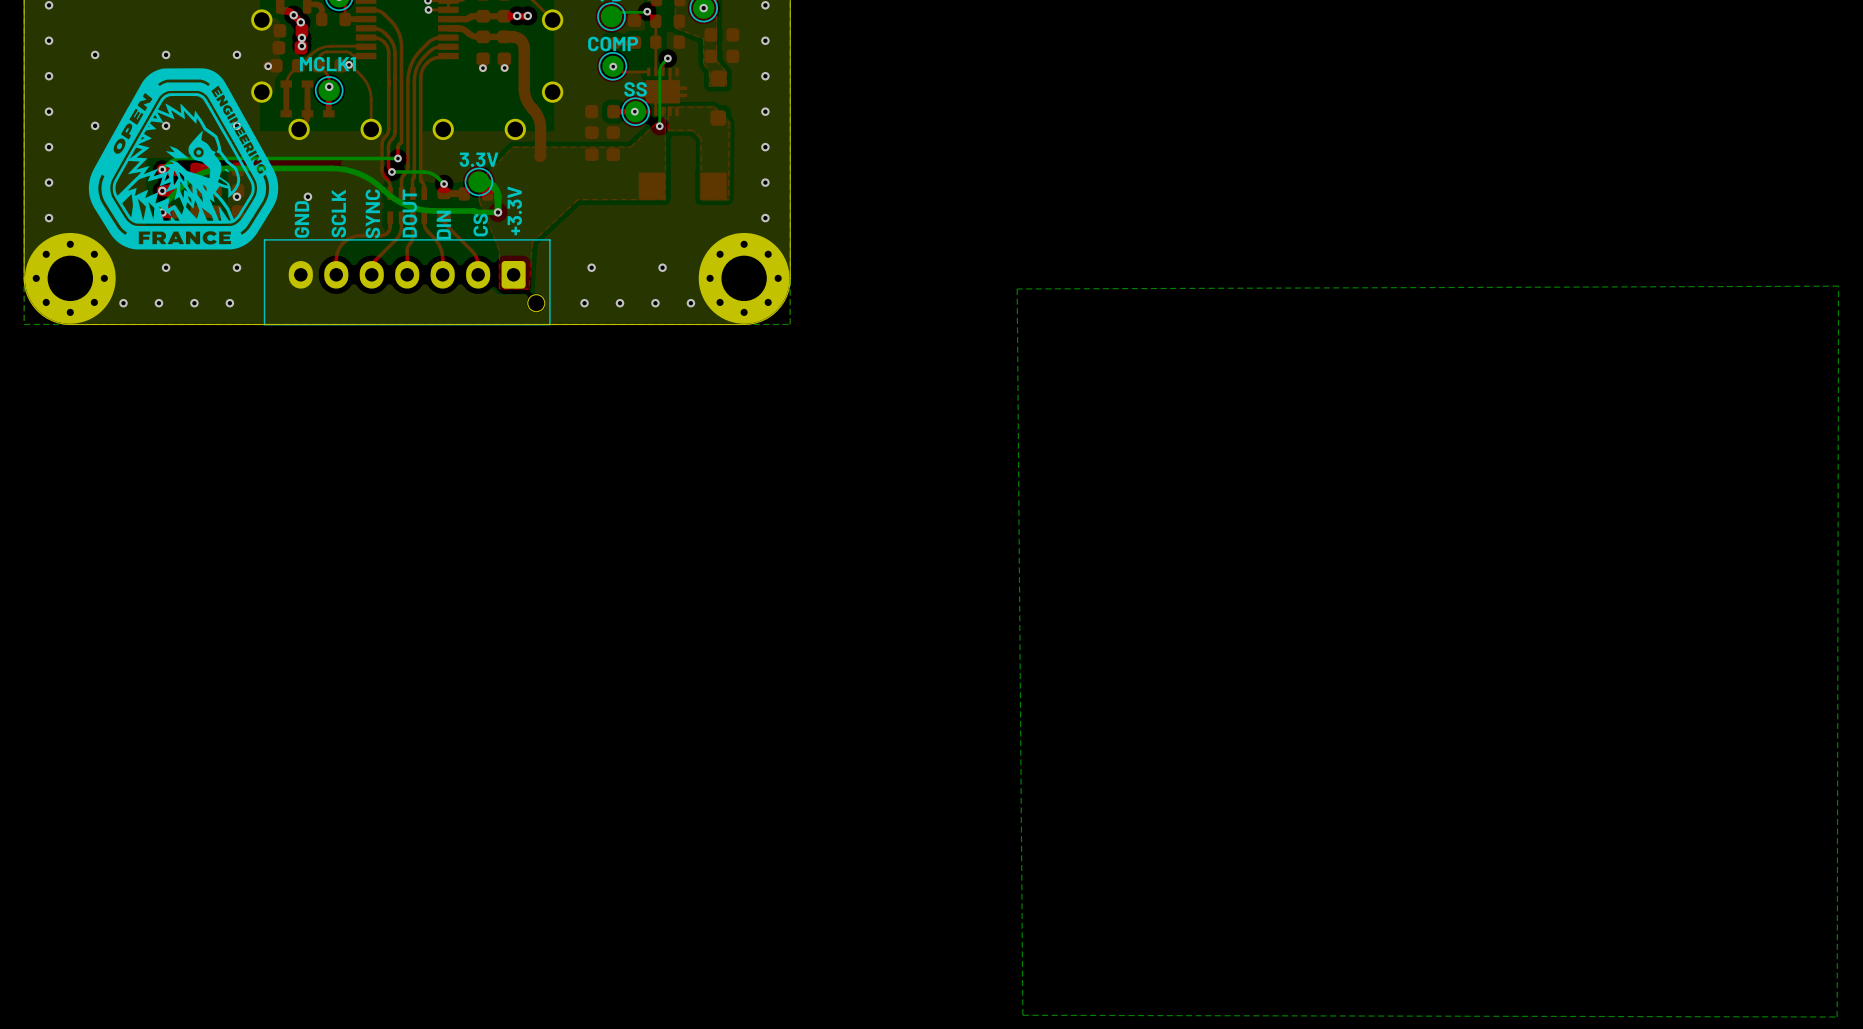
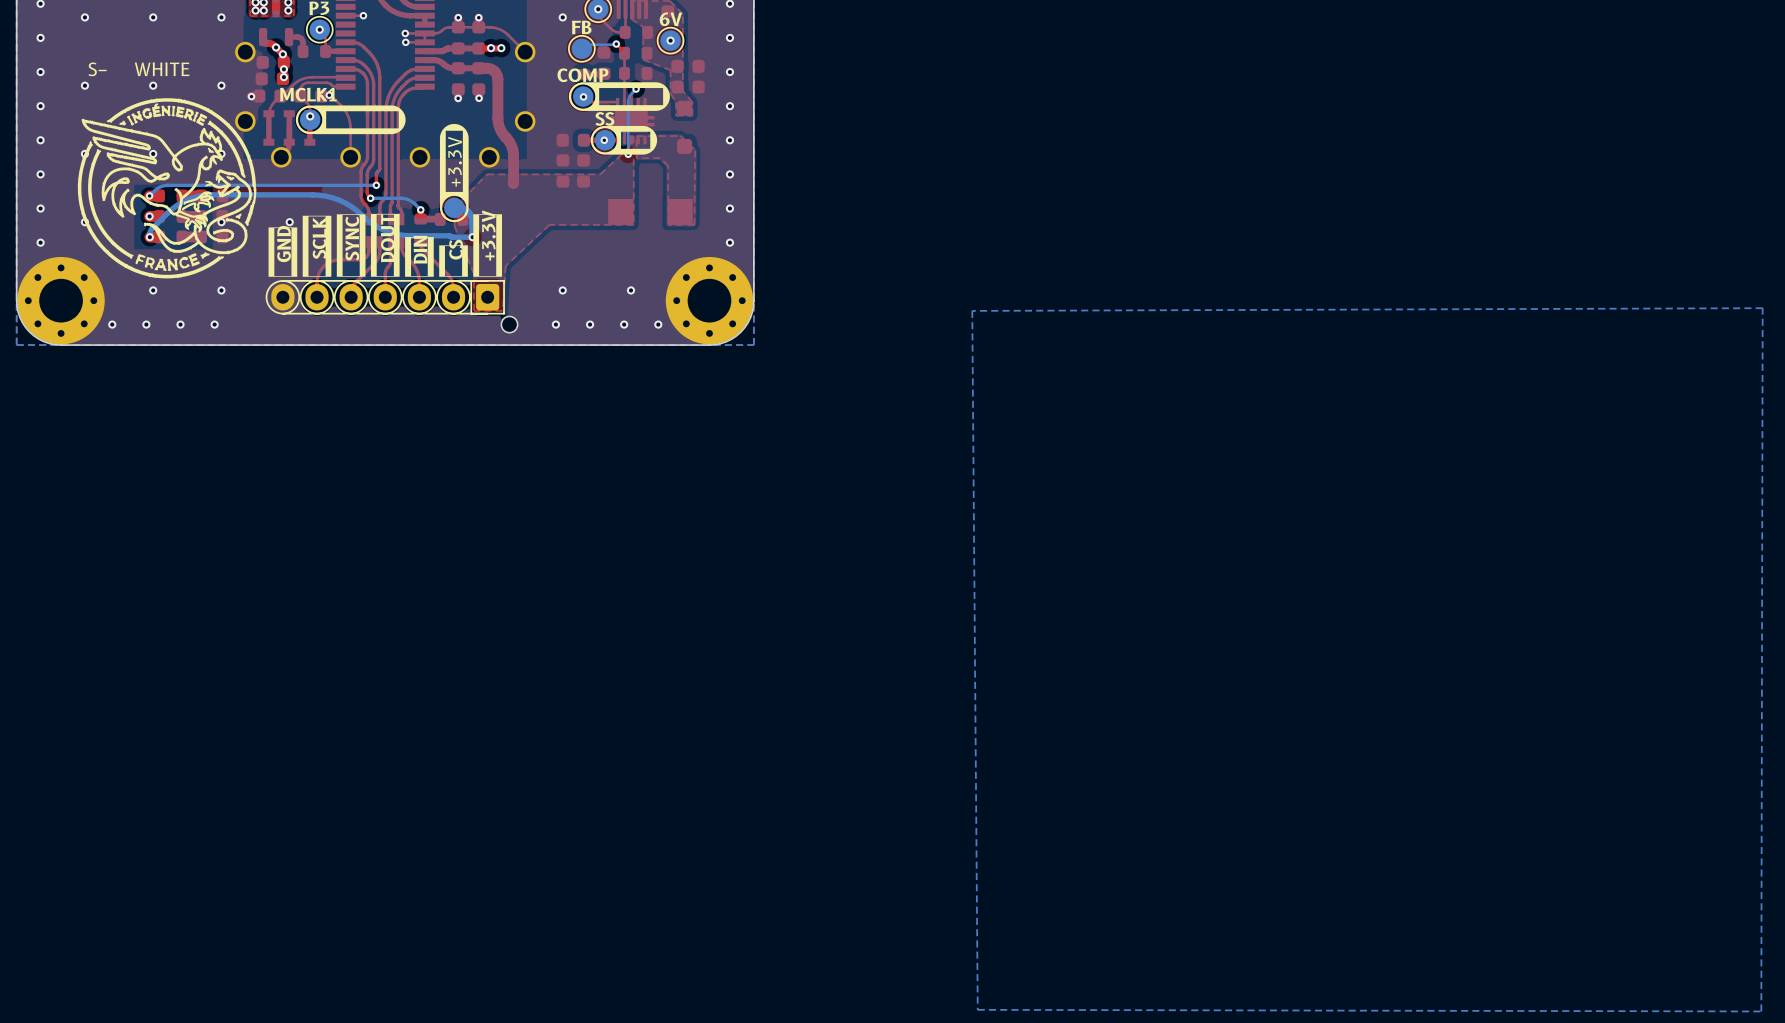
text: none -> S− (97, 69)
text: none -> WHITE (162, 69)
drawing: none -> [568, 82, 670, 155]
drawing shape: [88, 68, 279, 250] -> [77, 98, 257, 279]
drawing: none -> [295, 105, 406, 135]
drawing: none -> [265, 123, 502, 315]
text: 3.3V (479, 159) -> +3.3V (455, 161)
line: (549, 239) (264, 239) (264, 324) (549, 324) (549, 239) -> none
line: none -> (282, 280) (504, 280) (504, 313) (282, 313)
line: none -> (471, 280) (471, 313)

